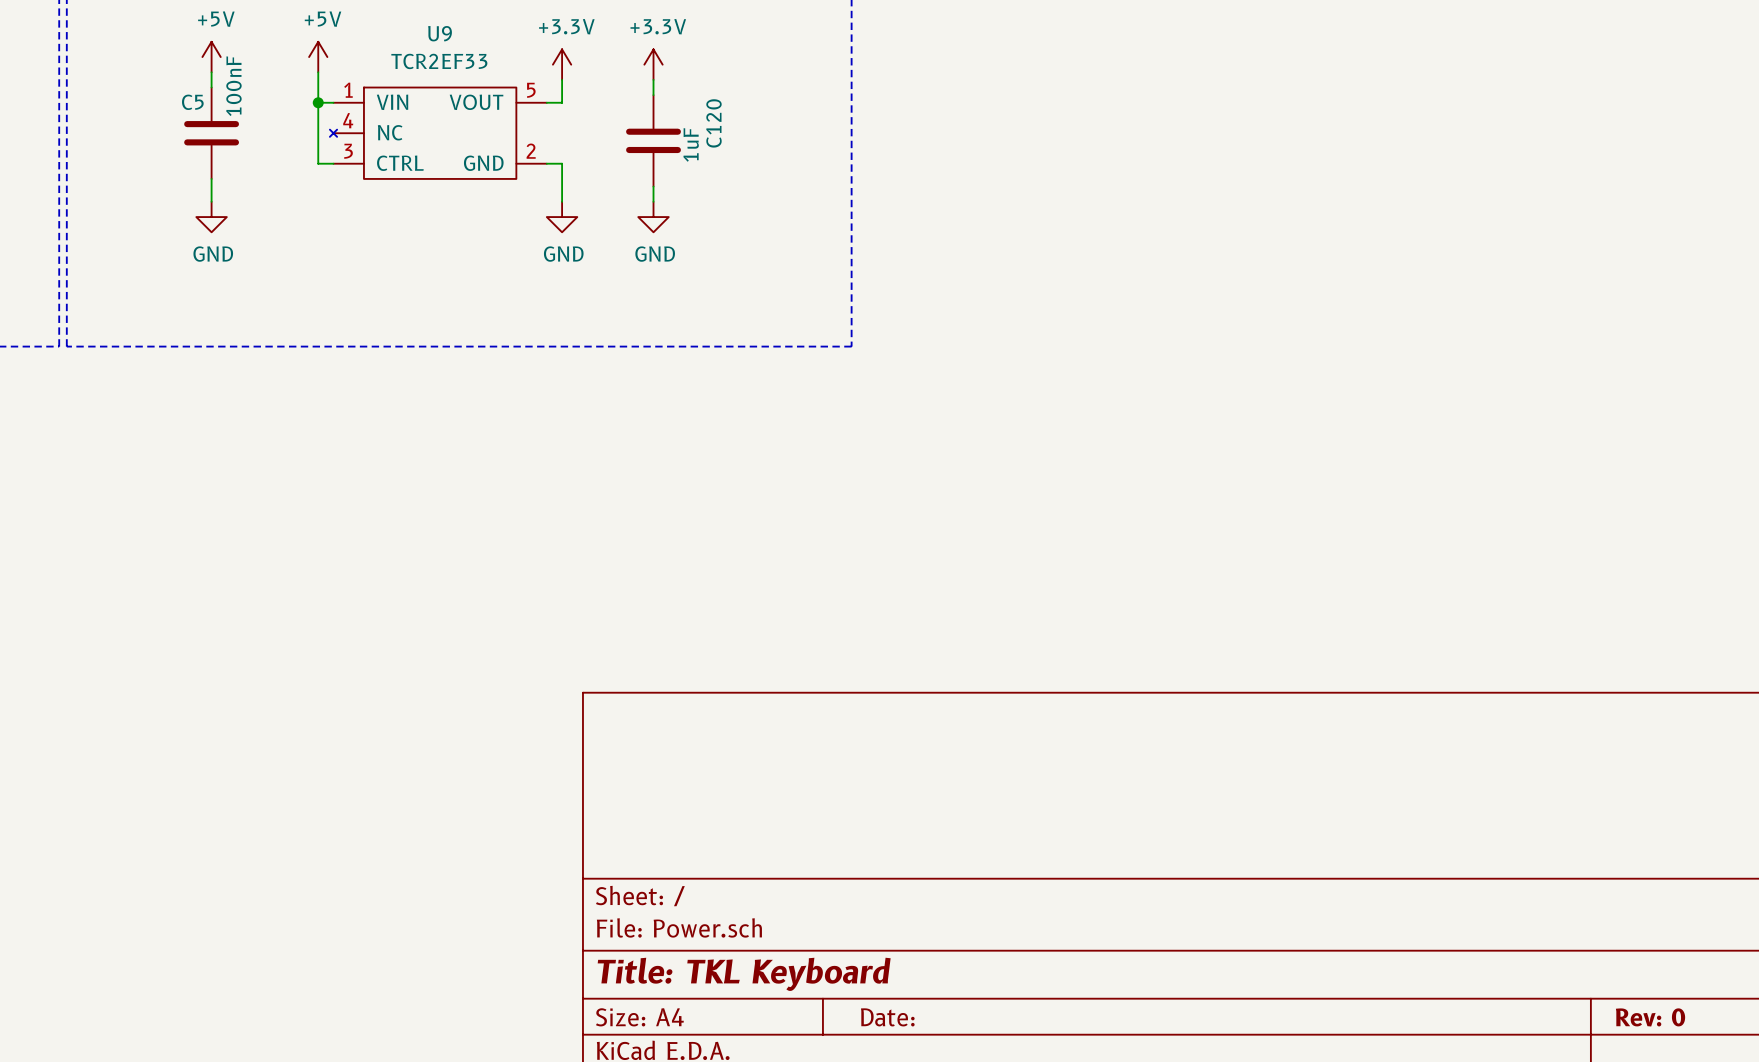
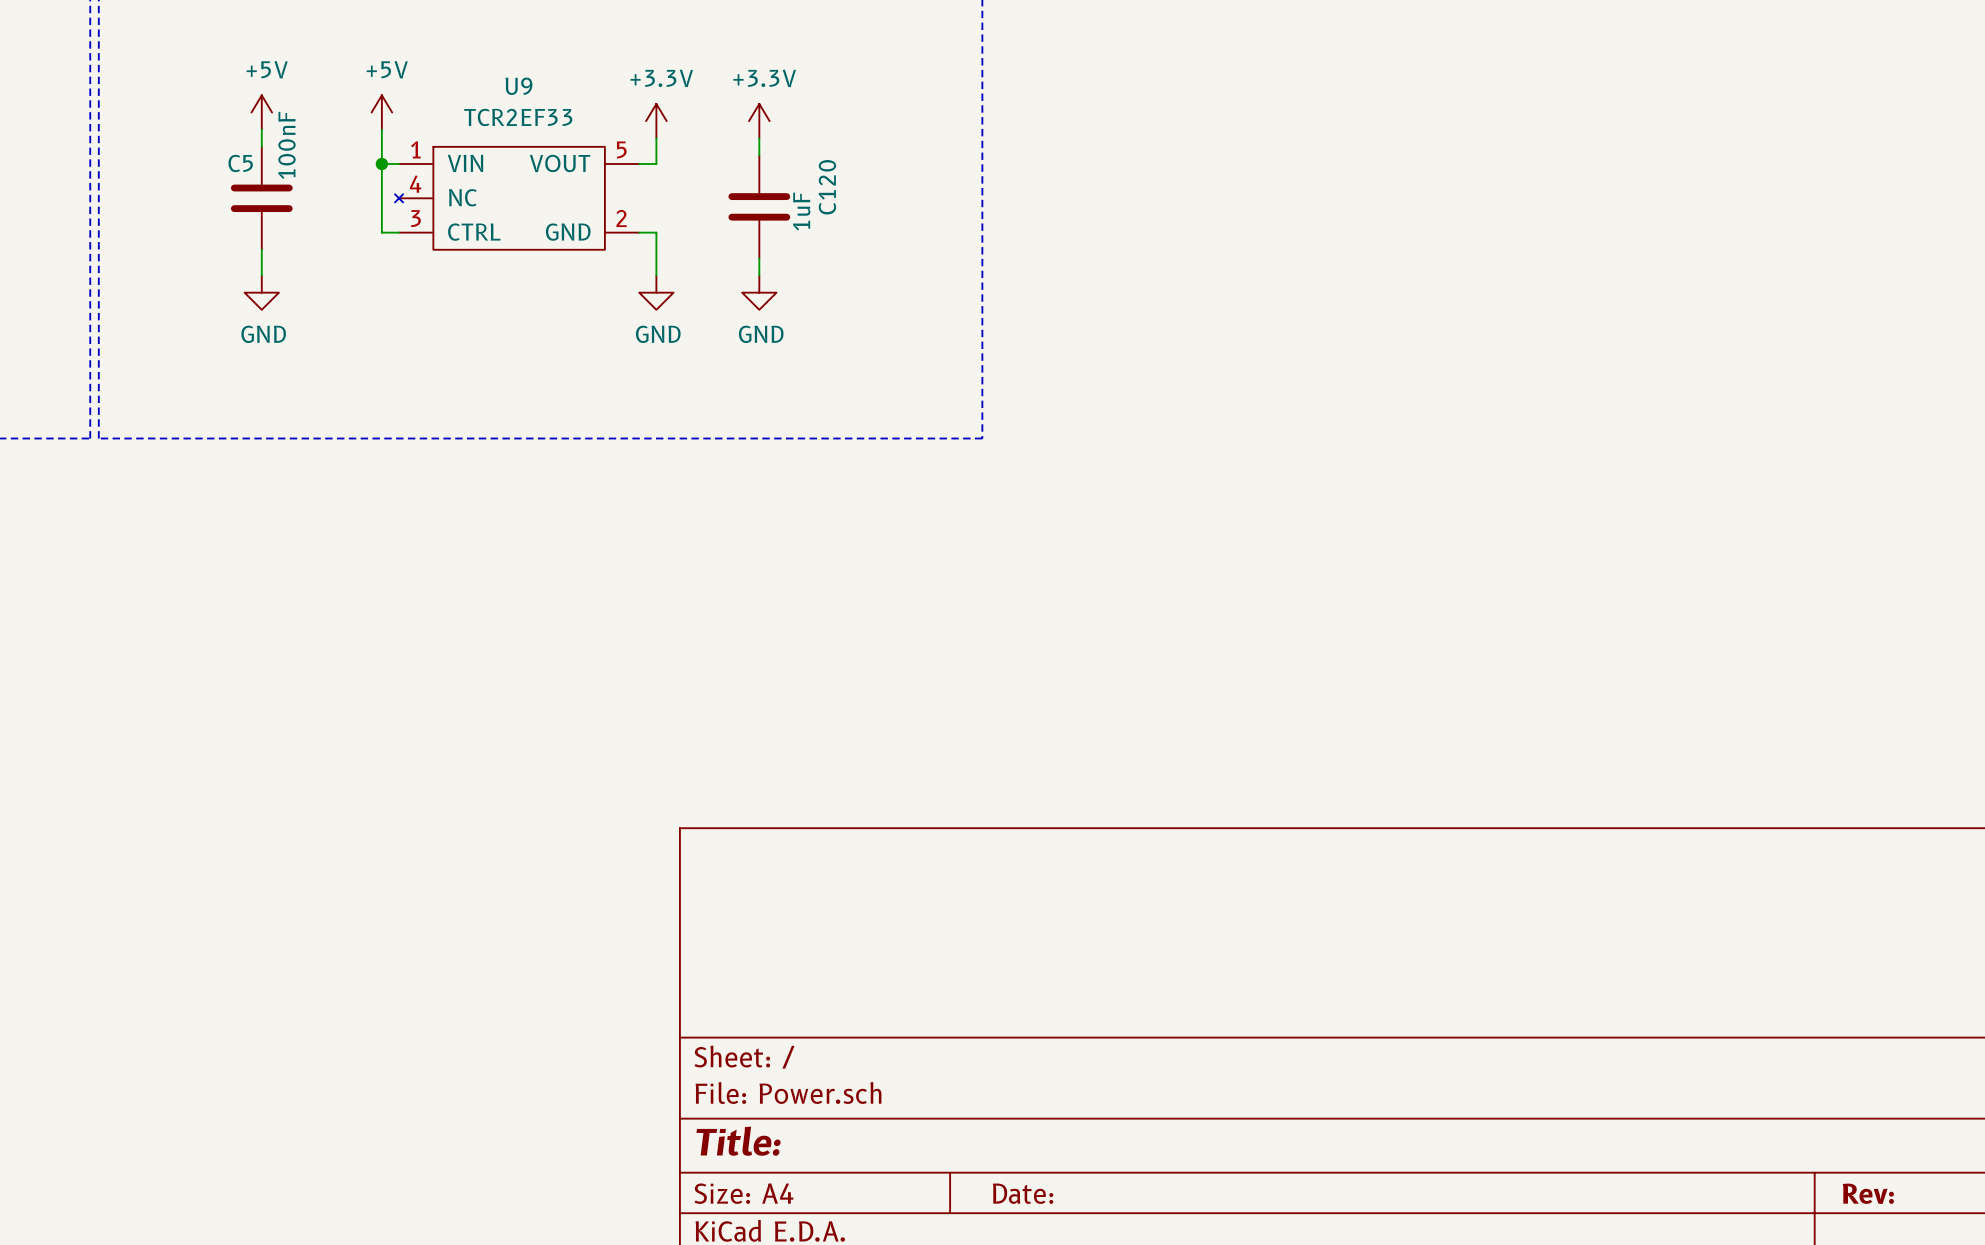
title block: Title: TKL Keyboard (744, 974) -> Title: (738, 1141)
title block: Rev: 0 (1650, 1017) -> Rev: (1868, 1193)

